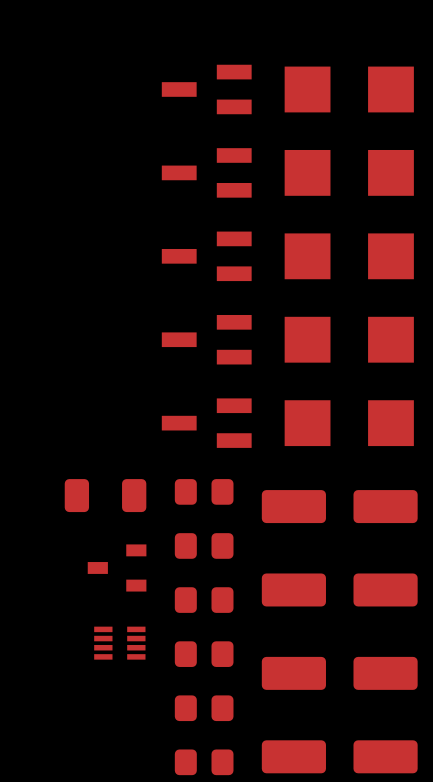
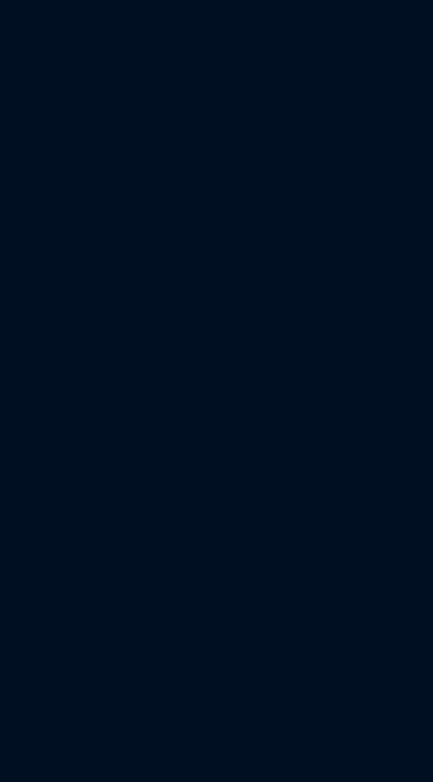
part: (206, 89) -> none
part: (307, 89) -> none
part: (390, 89) -> none
part: (206, 172) -> none
part: (307, 172) -> none
part: (390, 172) -> none
part: (206, 256) -> none
part: (307, 256) -> none
part: (390, 256) -> none
part: (206, 339) -> none
part: (307, 339) -> none
part: (390, 339) -> none
part: (206, 423) -> none
part: (307, 423) -> none
part: (390, 423) -> none
part: (204, 491) -> none
part: (105, 495) -> none
part: (339, 506) -> none
part: (204, 545) -> none
part: (117, 567) -> none
part: (339, 589) -> none
part: (204, 600) -> none
part: (119, 643) -> none
part: (204, 654) -> none
part: (339, 673) -> none
part: (204, 708) -> none
part: (339, 756) -> none
part: (204, 762) -> none

